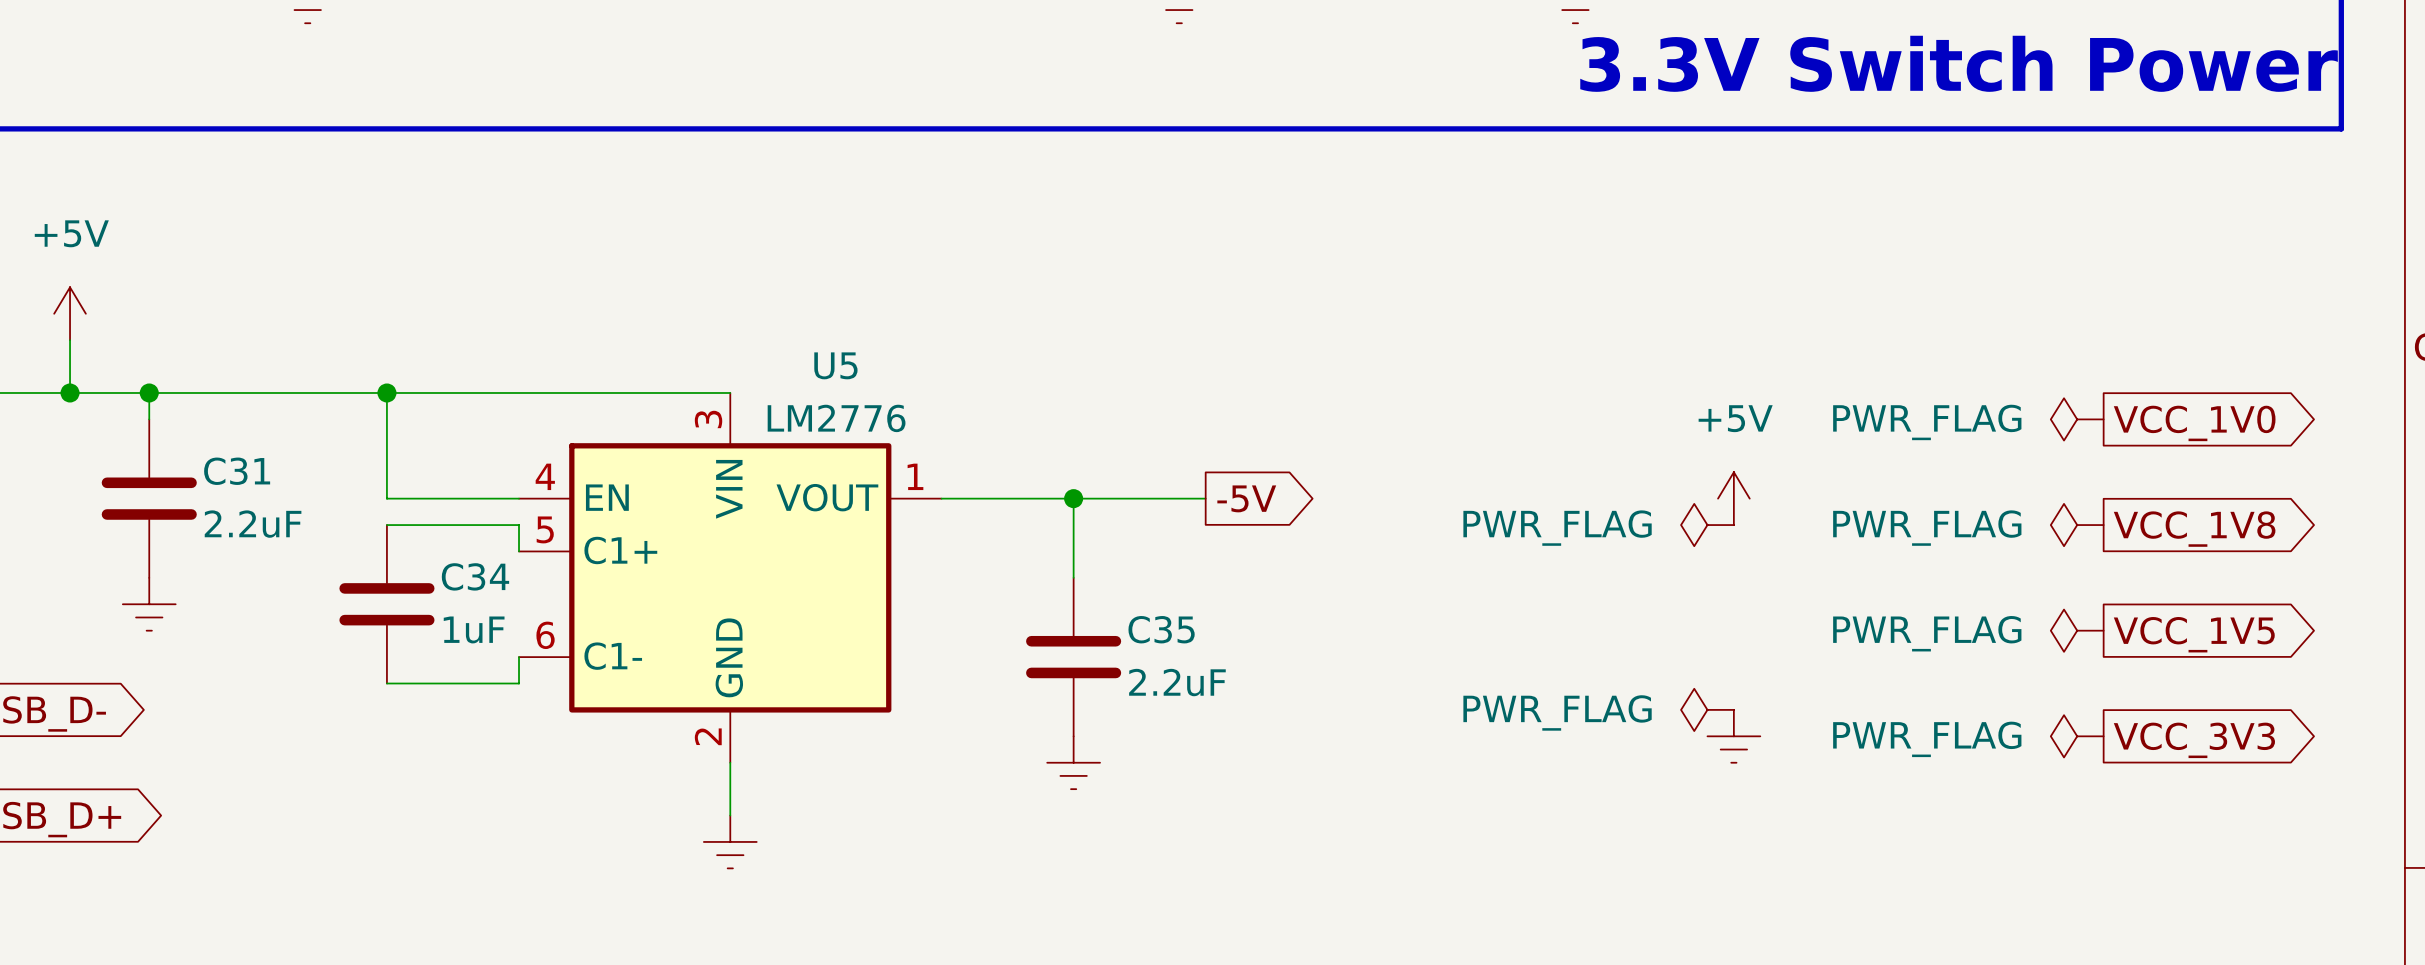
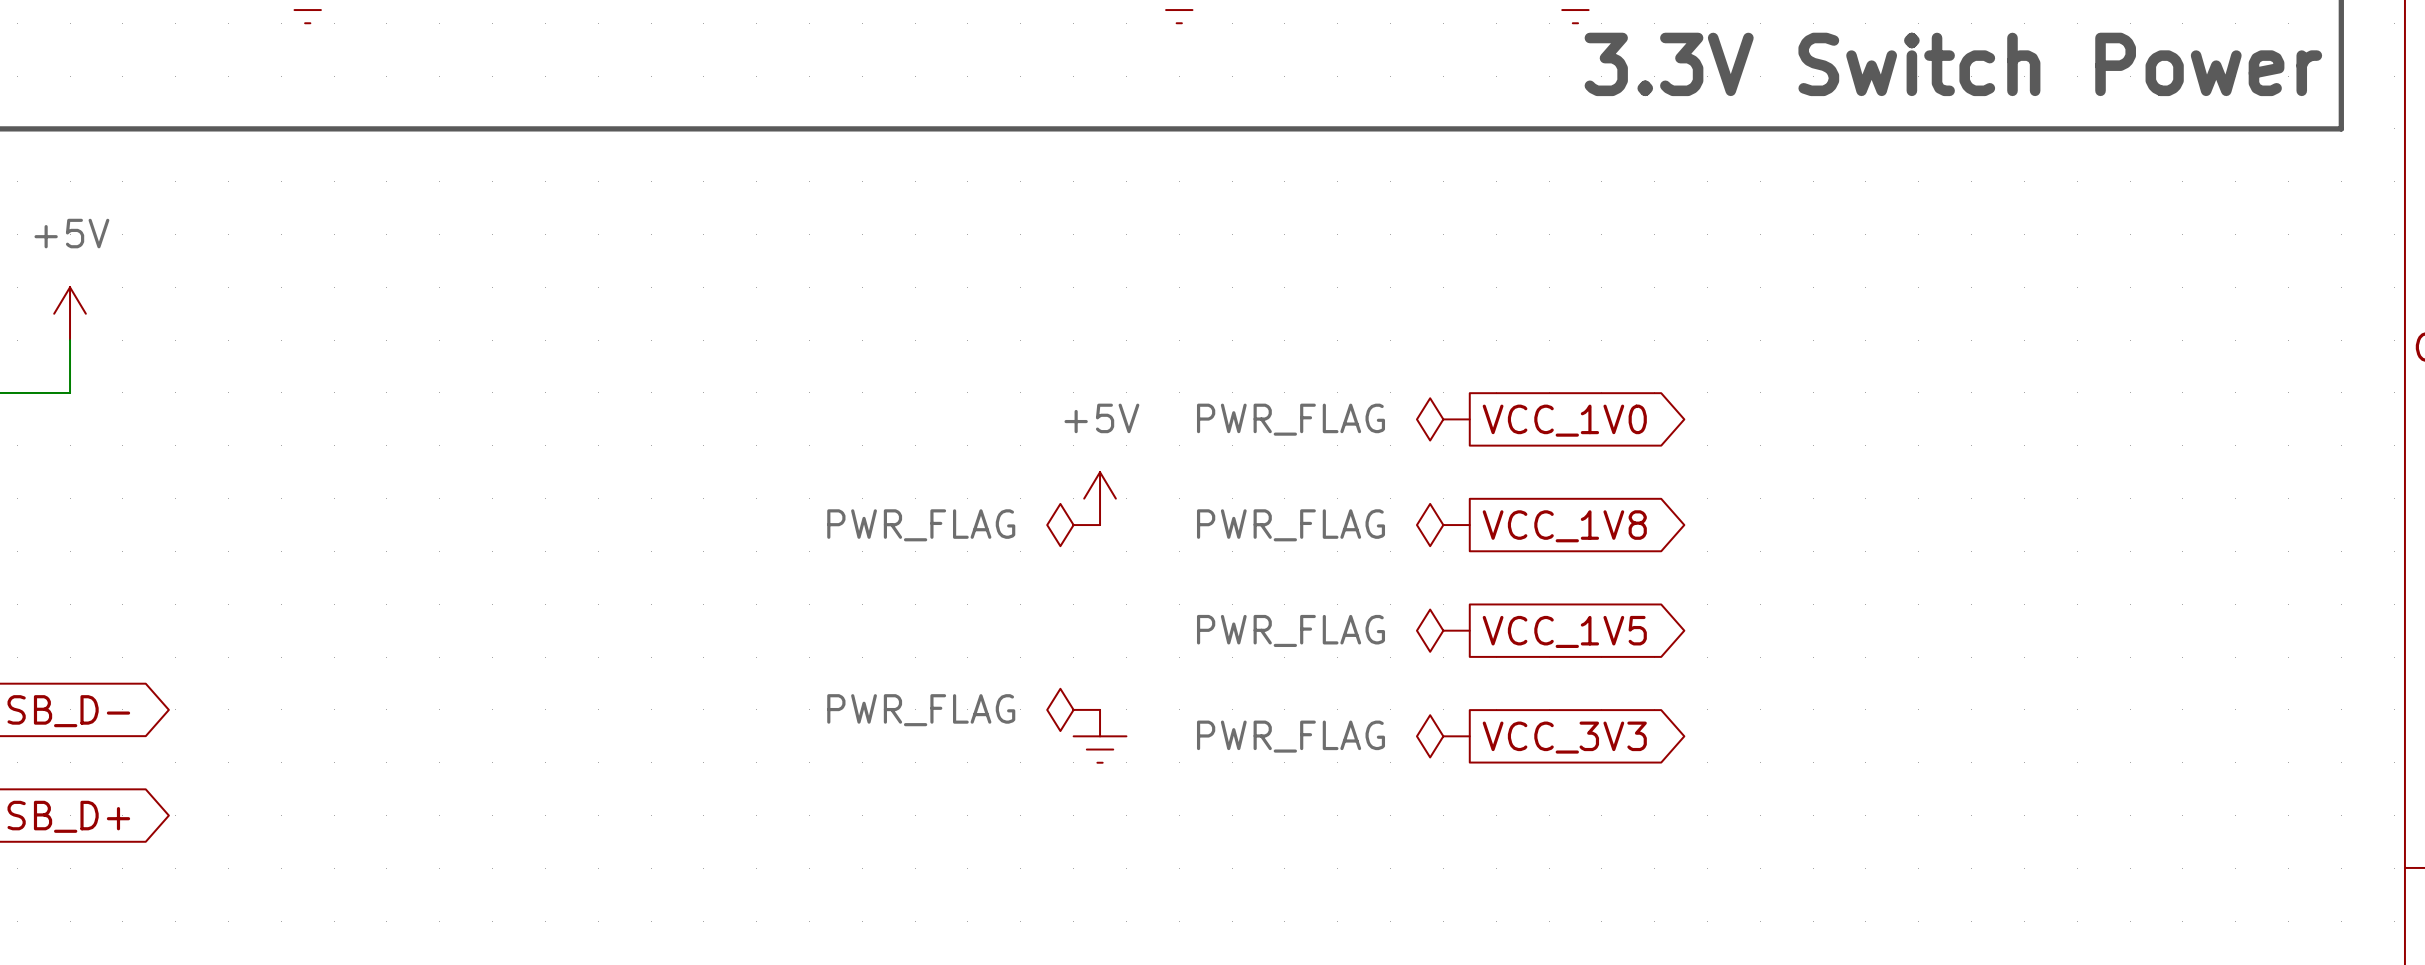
wire: (70, 392) (730, 392) -> none
junction: (70, 392) -> none
wire: (149, 392) (149, 419) -> none
junction: (149, 392) -> none
wire: (386, 392) (386, 498) (519, 498) -> none
junction: (386, 392) -> none
power symbol: none -> PWR_FLAG (1443, 419)
power symbol: PWR_FLAG (2077, 419) -> none
global label: none -> VCC_1V0 (1564, 420)
global label: VCC_1V0 (2194, 423) -> none
C31: 2.2uF (149, 498) -> none
wire: (941, 498) (1205, 498) -> none
wire: (1073, 498) (1073, 577) -> none
junction: (1073, 498) -> none
power symbol: none -> +5V (1100, 498)
global label: -5V (1246, 498) -> none
power symbol: +5V (1733, 498) -> none
wire: (386, 525) (519, 525) (519, 551) -> none
power symbol: none -> PWR_FLAG (1073, 525)
power symbol: none -> PWR_FLAG (1443, 525)
power symbol: PWR_FLAG (1707, 525) -> none
power symbol: PWR_FLAG (2077, 525) -> none
global label: none -> VCC_1V8 (1564, 526)
global label: VCC_1V8 (2194, 529) -> none
U5: LM2776 (730, 577) -> none
power symbol: (149, 604) -> none
C34: 1uF (386, 604) -> none
power symbol: none -> PWR_FLAG (1443, 630)
power symbol: PWR_FLAG (2077, 630) -> none
global label: none -> VCC_1V5 (1564, 631)
global label: VCC_1V5 (2194, 634) -> none
wire: (519, 657) (519, 683) (386, 683) -> none
C35: 2.2uF (1073, 657) -> none
power symbol: none -> PWR_FLAG (1073, 709)
power symbol: PWR_FLAG (1707, 709) -> none
power symbol: none -> PWR_FLAG (1443, 736)
power symbol: (1733, 736) -> none
power symbol: PWR_FLAG (2077, 736) -> none
global label: none -> VCC_3V3 (1564, 737)
global label: VCC_3V3 (2194, 740) -> none
wire: (730, 762) (730, 815) -> none
power symbol position: (1073, 762) -> (1100, 736)
power symbol: (730, 841) -> none

